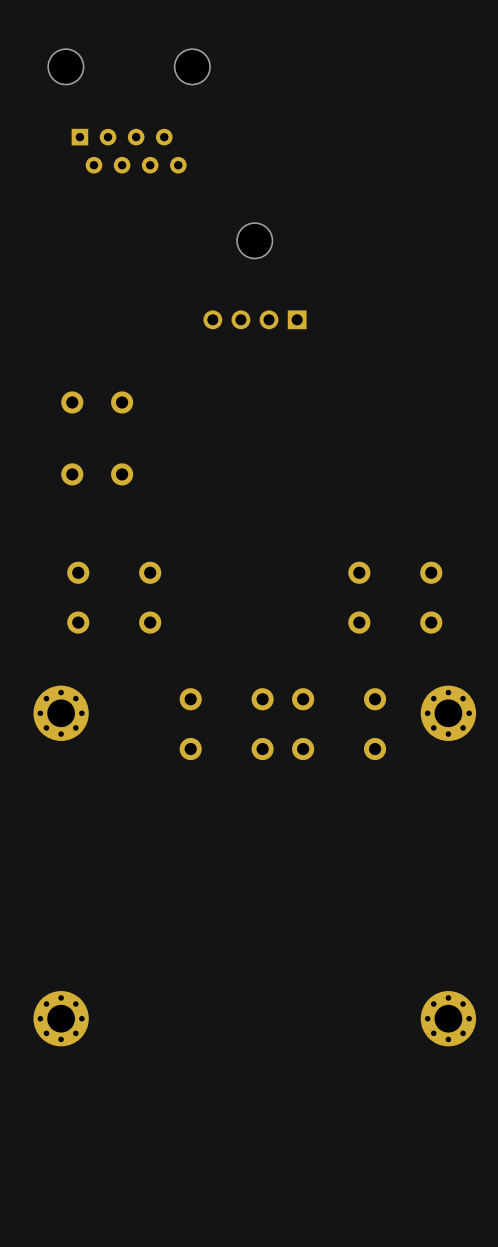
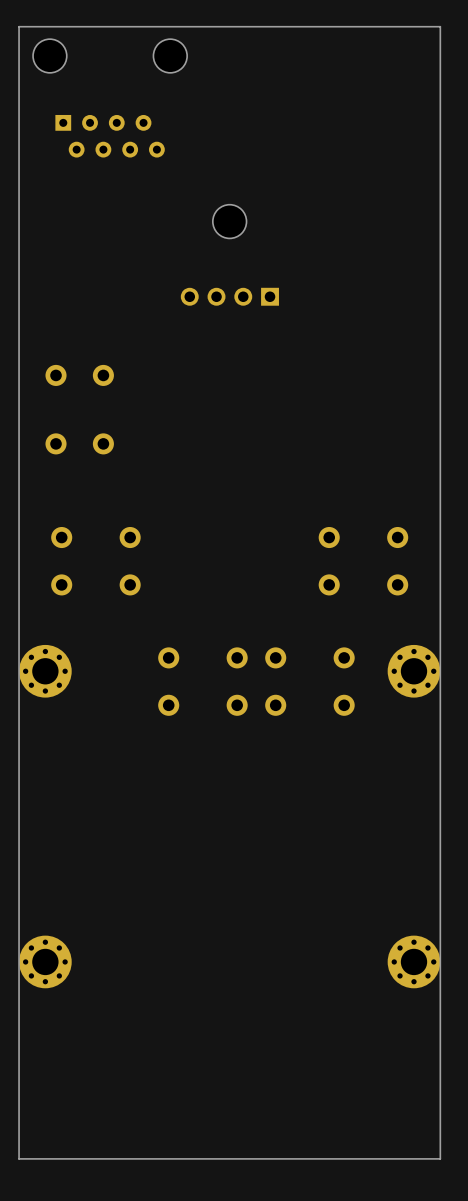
board edge: none -> (440, 26) (19, 26) (19, 1158) (440, 1158) (440, 26)

